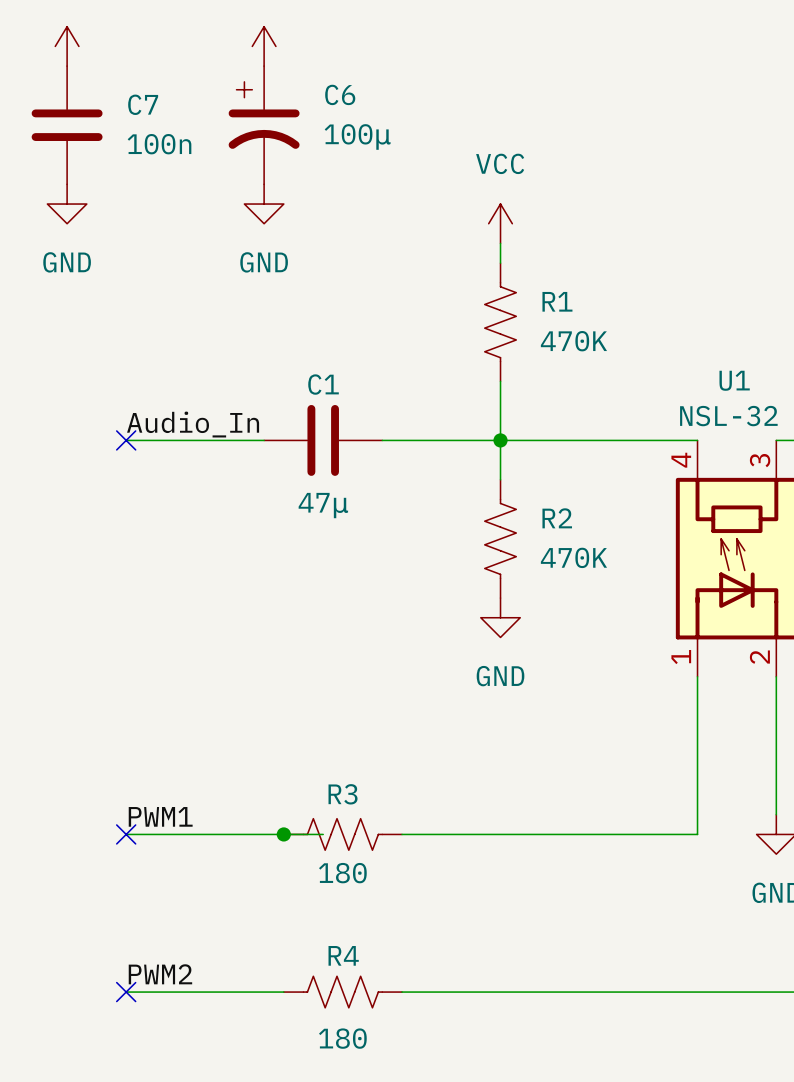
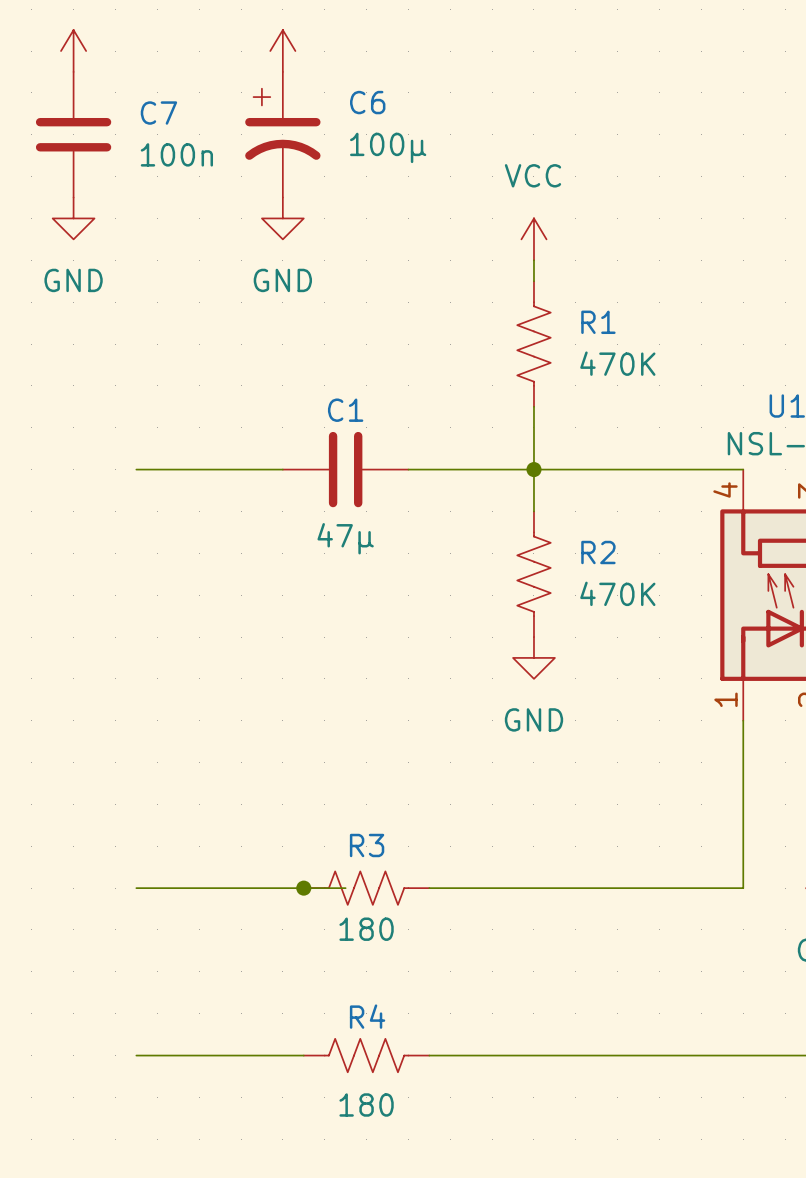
label: Audio_In (193, 424) -> none
no-connect mark: (126, 440) -> none
label: PWM1 (160, 816) -> none
no-connect mark: (126, 834) -> none
label: PWM2 (160, 974) -> none
no-connect mark: (126, 992) -> none

